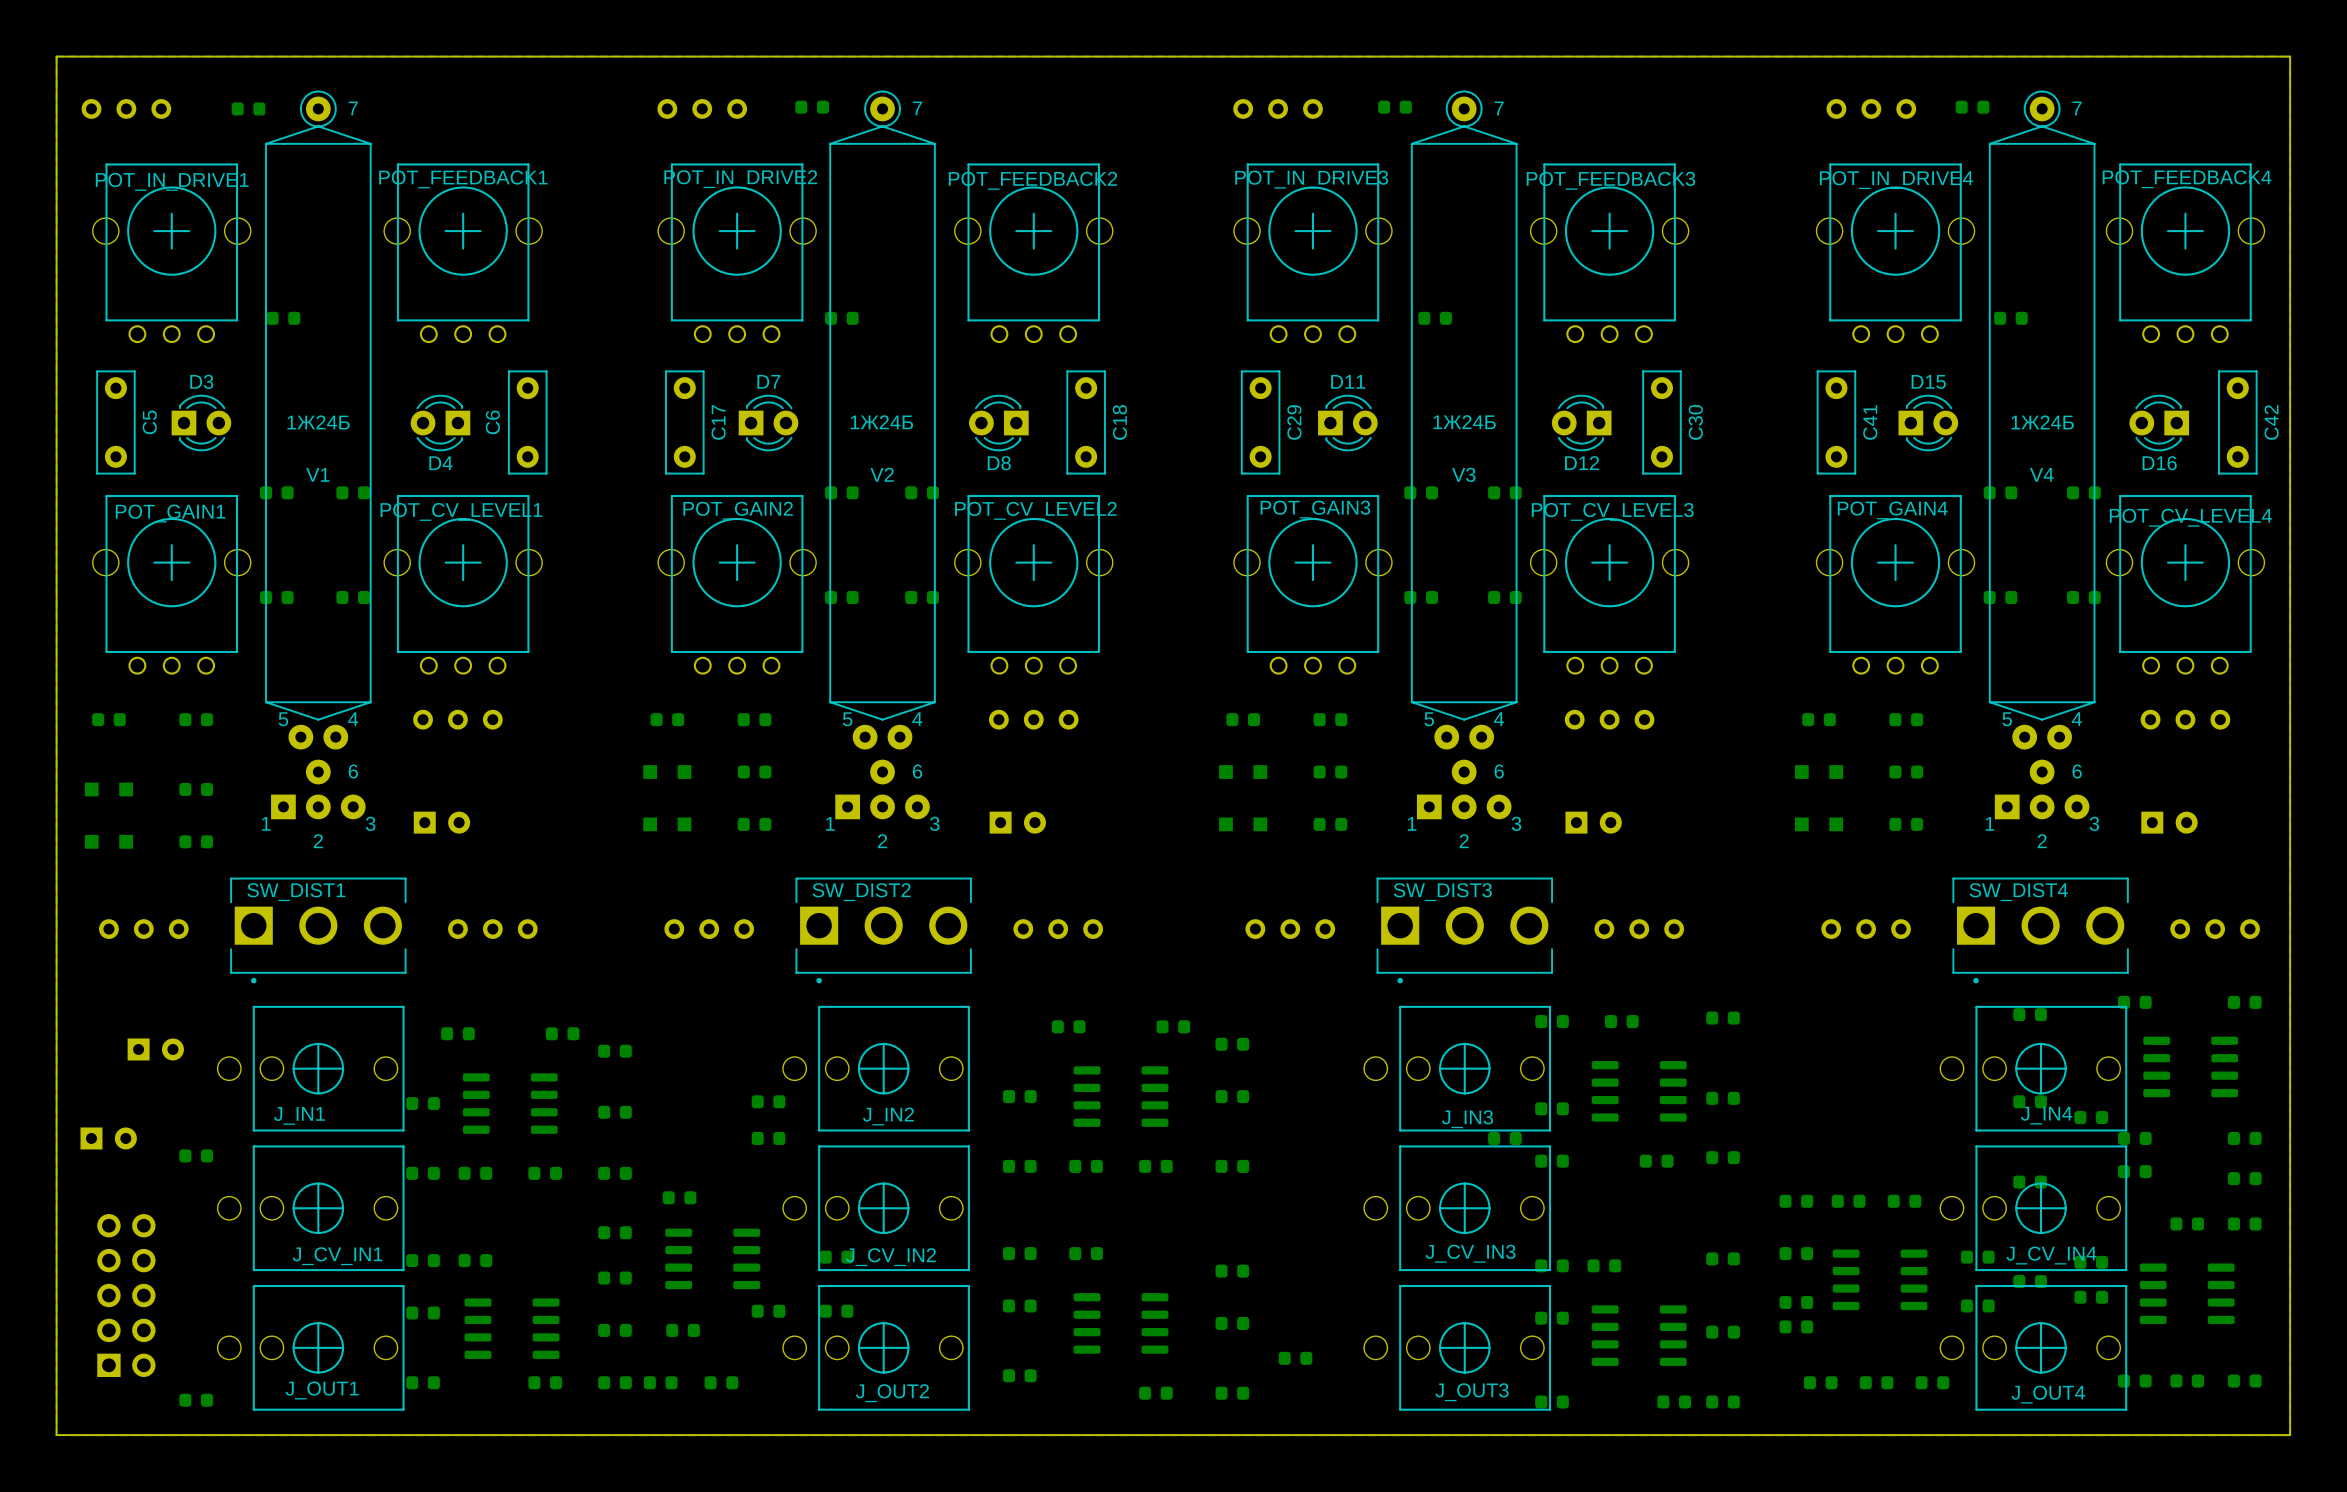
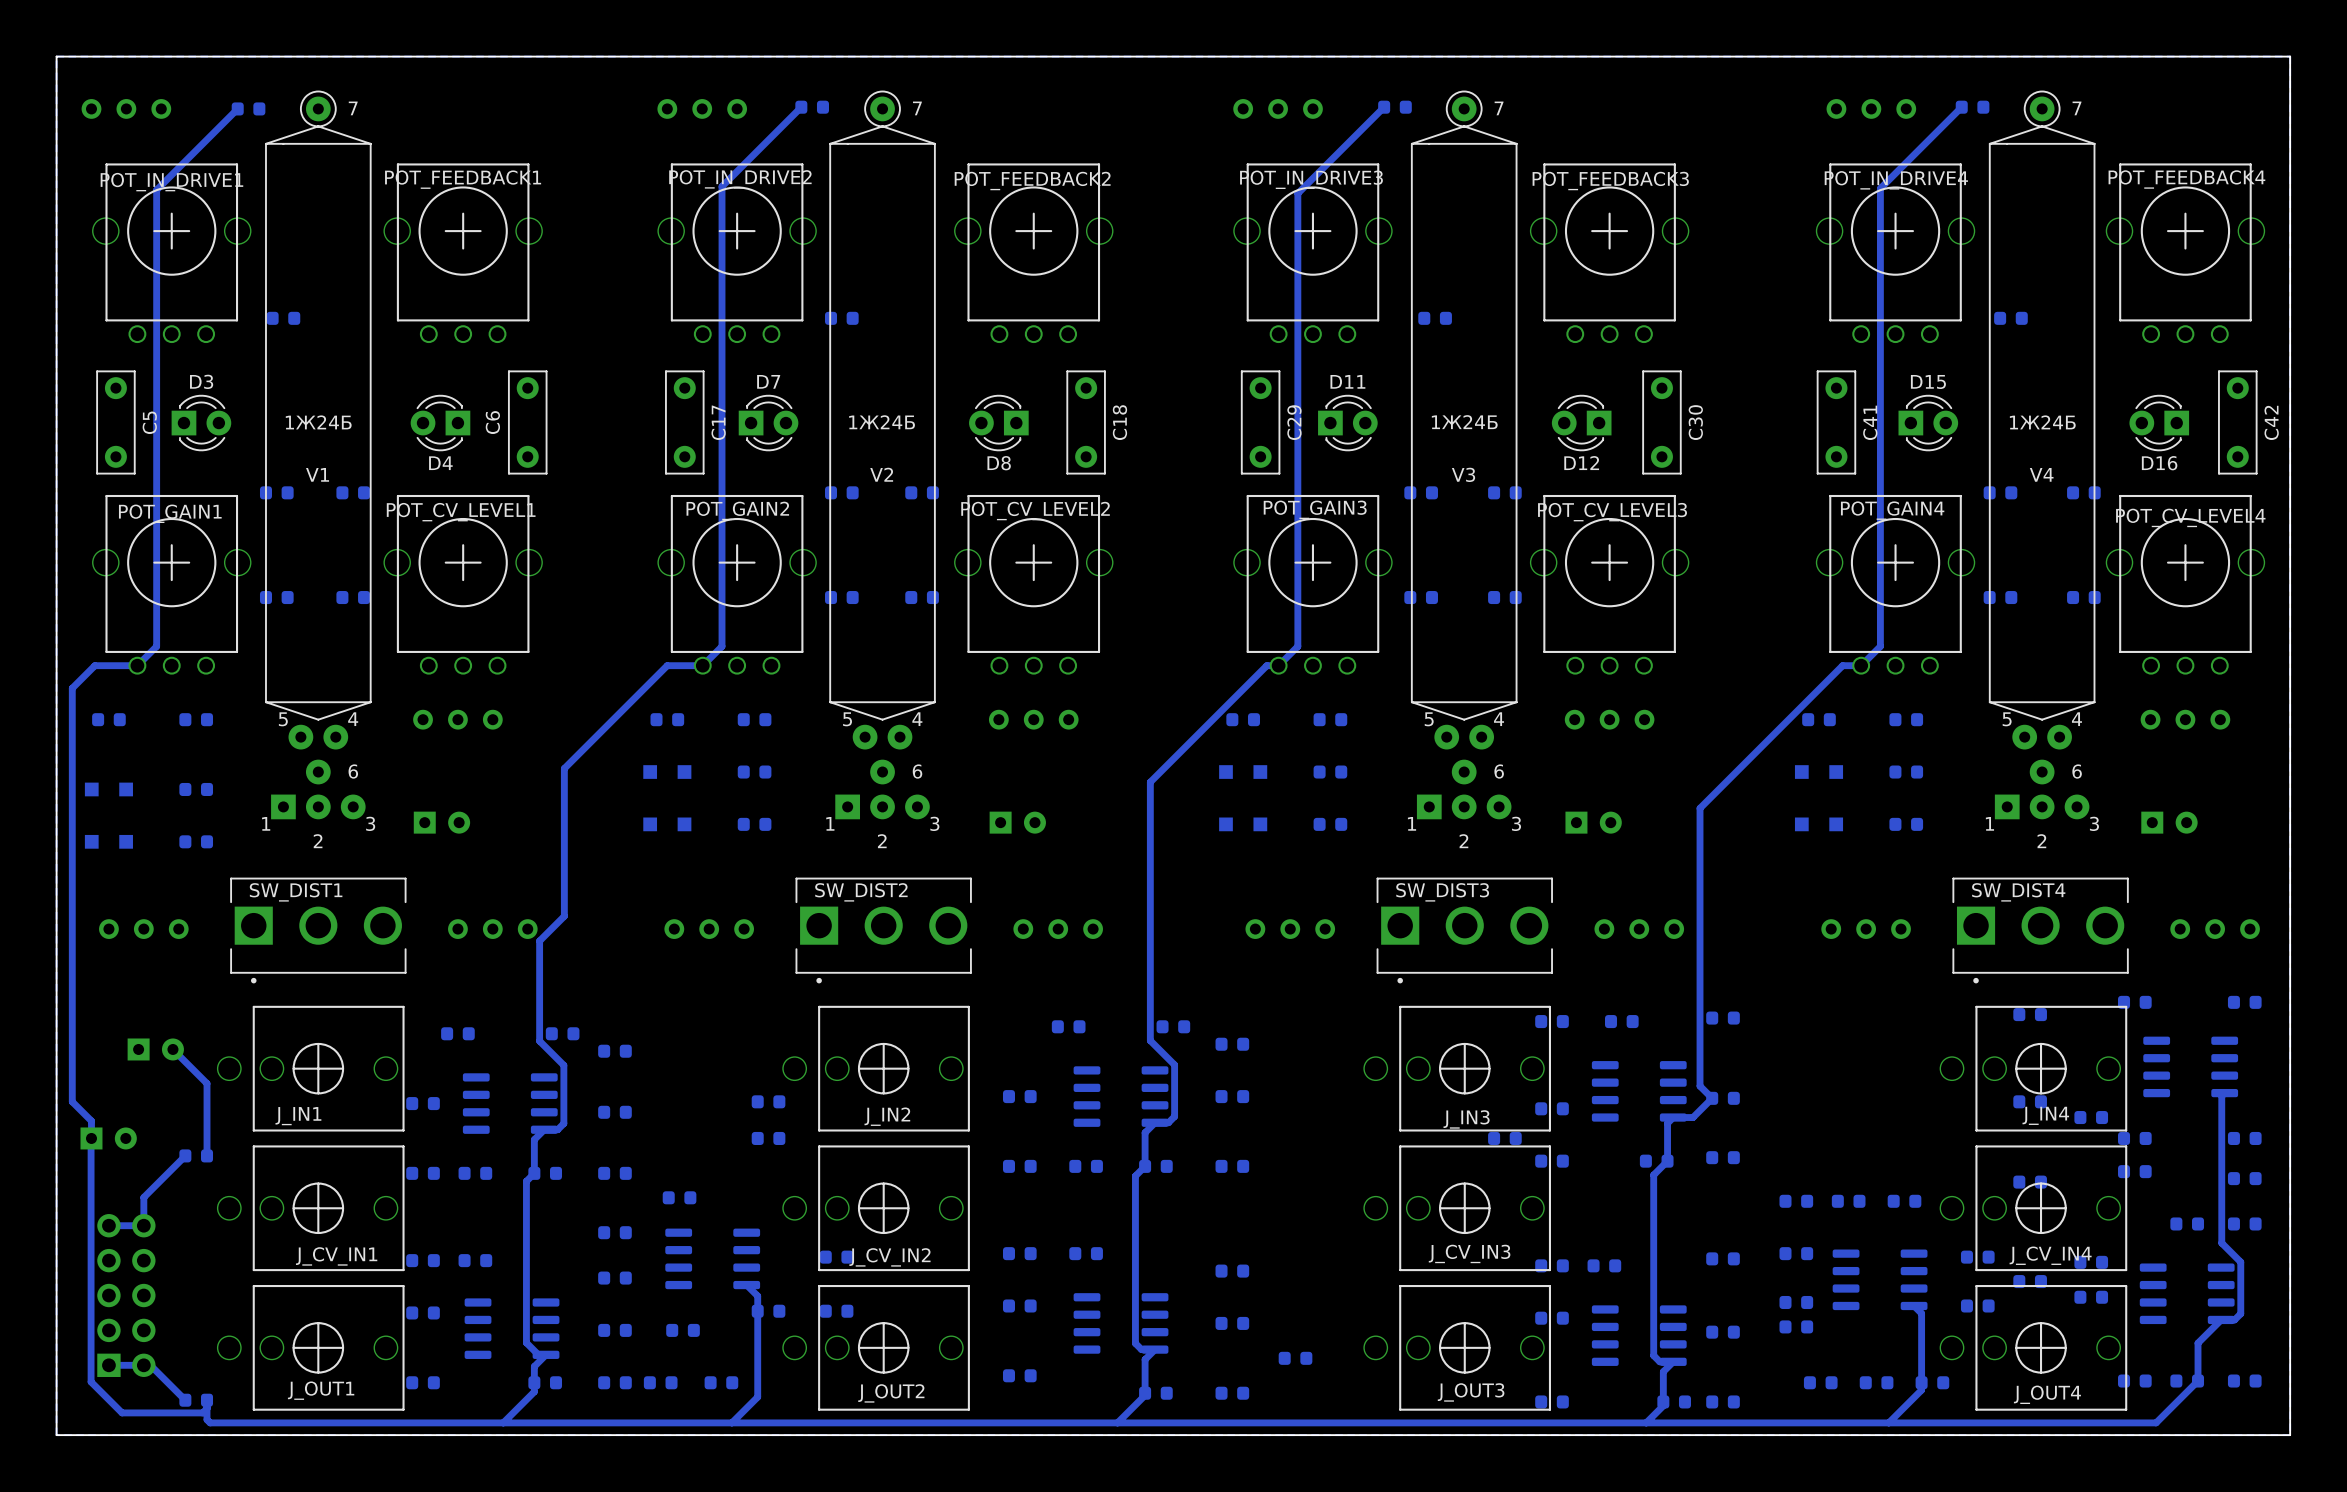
bottom track: none -> (801, 107) (722, 186) (722, 646) (702, 665) (667, 665) (564, 768) (564, 916) (539, 940) (539, 1041) (563, 1065) (563, 1123) (557, 1129) (544, 1129) (534, 1139) (534, 1173) (526, 1181) (526, 1342) (538, 1354) (546, 1354) (534, 1366) (534, 1391) (503, 1422)
bottom track: none -> (1384, 107) (1297, 193) (1297, 646) (1278, 665) (1266, 665) (1150, 782) (1150, 1040) (1174, 1064) (1174, 1116) (1168, 1122) (1155, 1122) (1145, 1132) (1145, 1166) (1135, 1176) (1135, 1343) (1141, 1349) (1155, 1349) (1145, 1359) (1145, 1395) (1117, 1422)
bottom track: none -> (1961, 107) (1880, 188) (1880, 646) (1861, 665) (1842, 665) (1700, 808) (1700, 1086) (1712, 1098) (1693, 1117) (1673, 1117) (1667, 1123) (1667, 1161) (1653, 1174) (1653, 1355) (1659, 1361) (1673, 1361) (1663, 1371) (1663, 1405) (1646, 1422)
bottom track: none -> (237, 108) (156, 190) (156, 646) (137, 665) (94, 665) (72, 688) (72, 1101) (91, 1121) (91, 1381) (122, 1412) (202, 1412) (207, 1408)
bottom track: none -> (172, 1049) (207, 1083) (207, 1155)
bottom track: none -> (2224, 1093) (2221, 1096) (2221, 1243) (2240, 1262) (2240, 1313) (2234, 1319) (2221, 1319) (2198, 1343) (2198, 1381) (2156, 1422) (210, 1422) (207, 1419) (207, 1400)
bottom track: none -> (185, 1155) (143, 1197) (143, 1225) (108, 1225)
bottom track: none -> (746, 1285) (757, 1296) (757, 1397) (731, 1422)
bottom track: none -> (1914, 1305) (1921, 1313) (1921, 1390) (1888, 1422)
bottom track: none -> (108, 1365) (150, 1365) (185, 1400)

